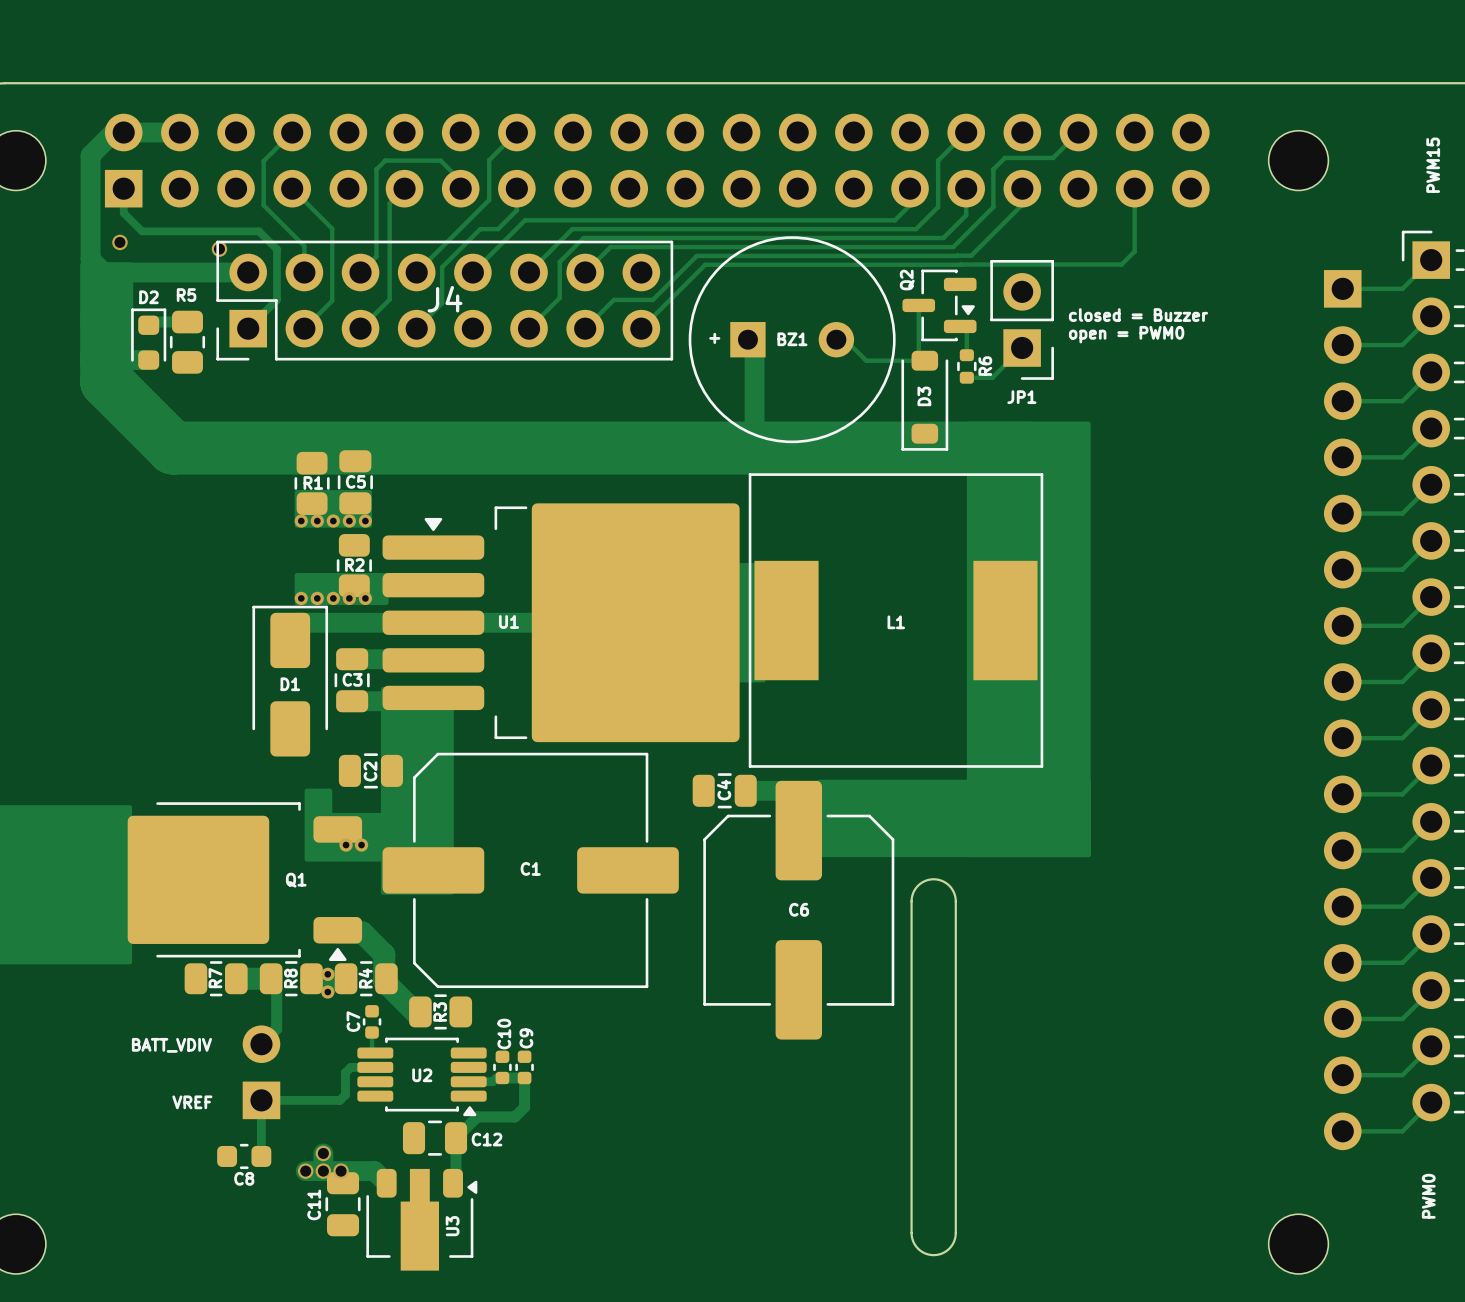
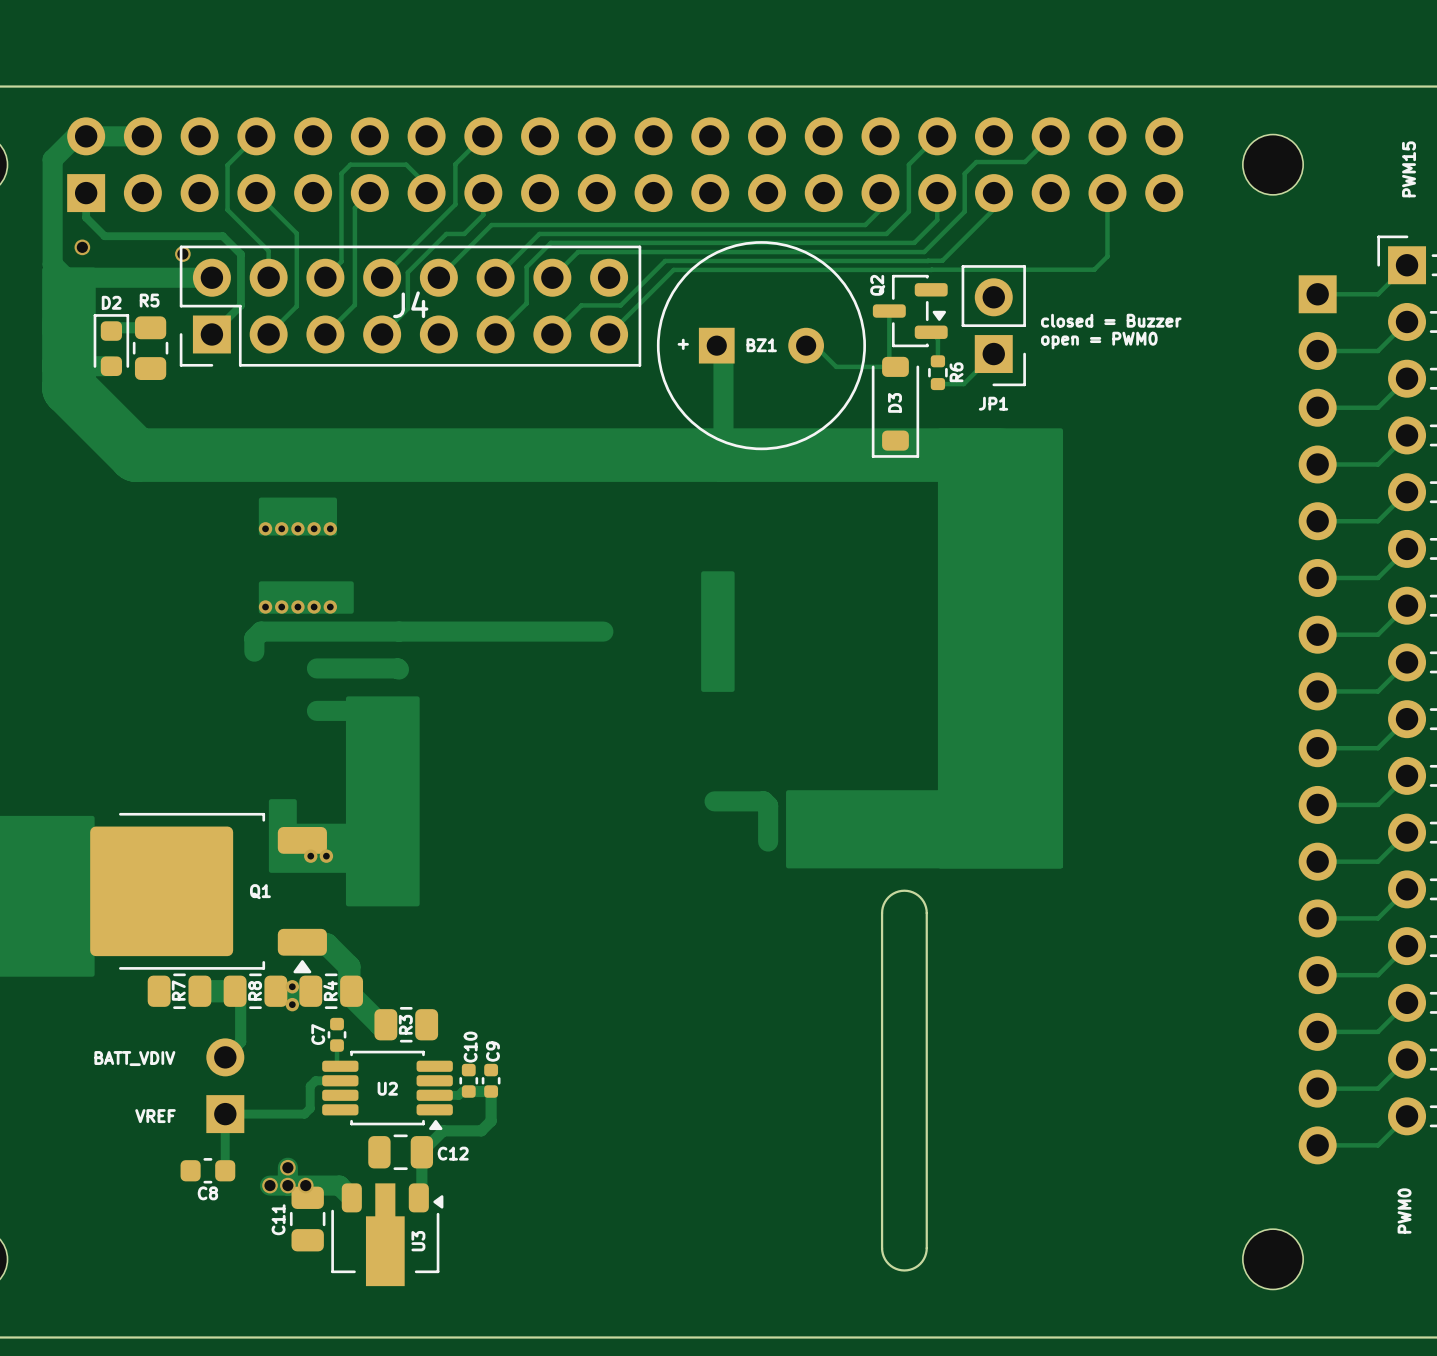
C5: (355, 482) -> none
R1: (312, 483) -> none
R2: (354, 565) -> none
L1: (895, 620) -> none
U1: (561, 622) -> none
C3: (352, 680) -> none
D1: (290, 681) -> none
C2: (370, 770) -> none
C4: (724, 790) -> none
C1: (530, 870) -> none
C6: (798, 910) -> none

